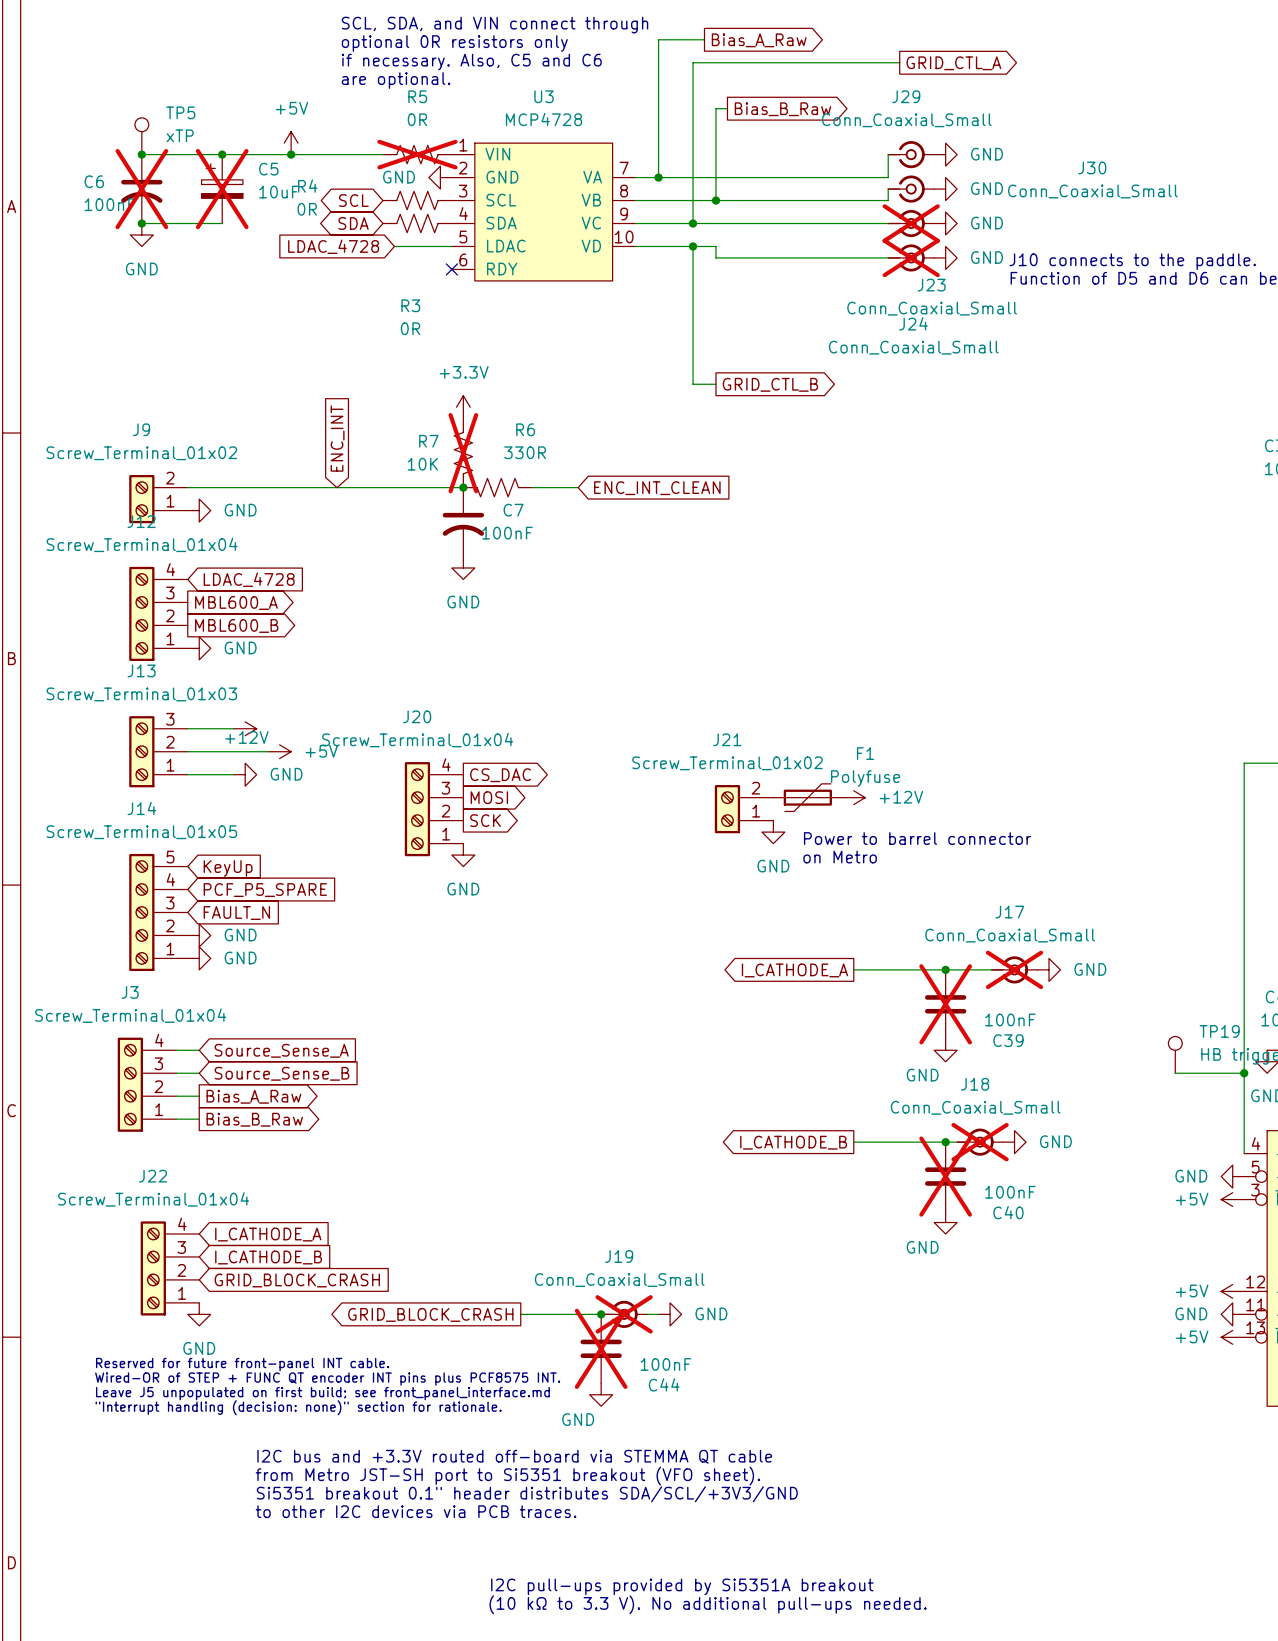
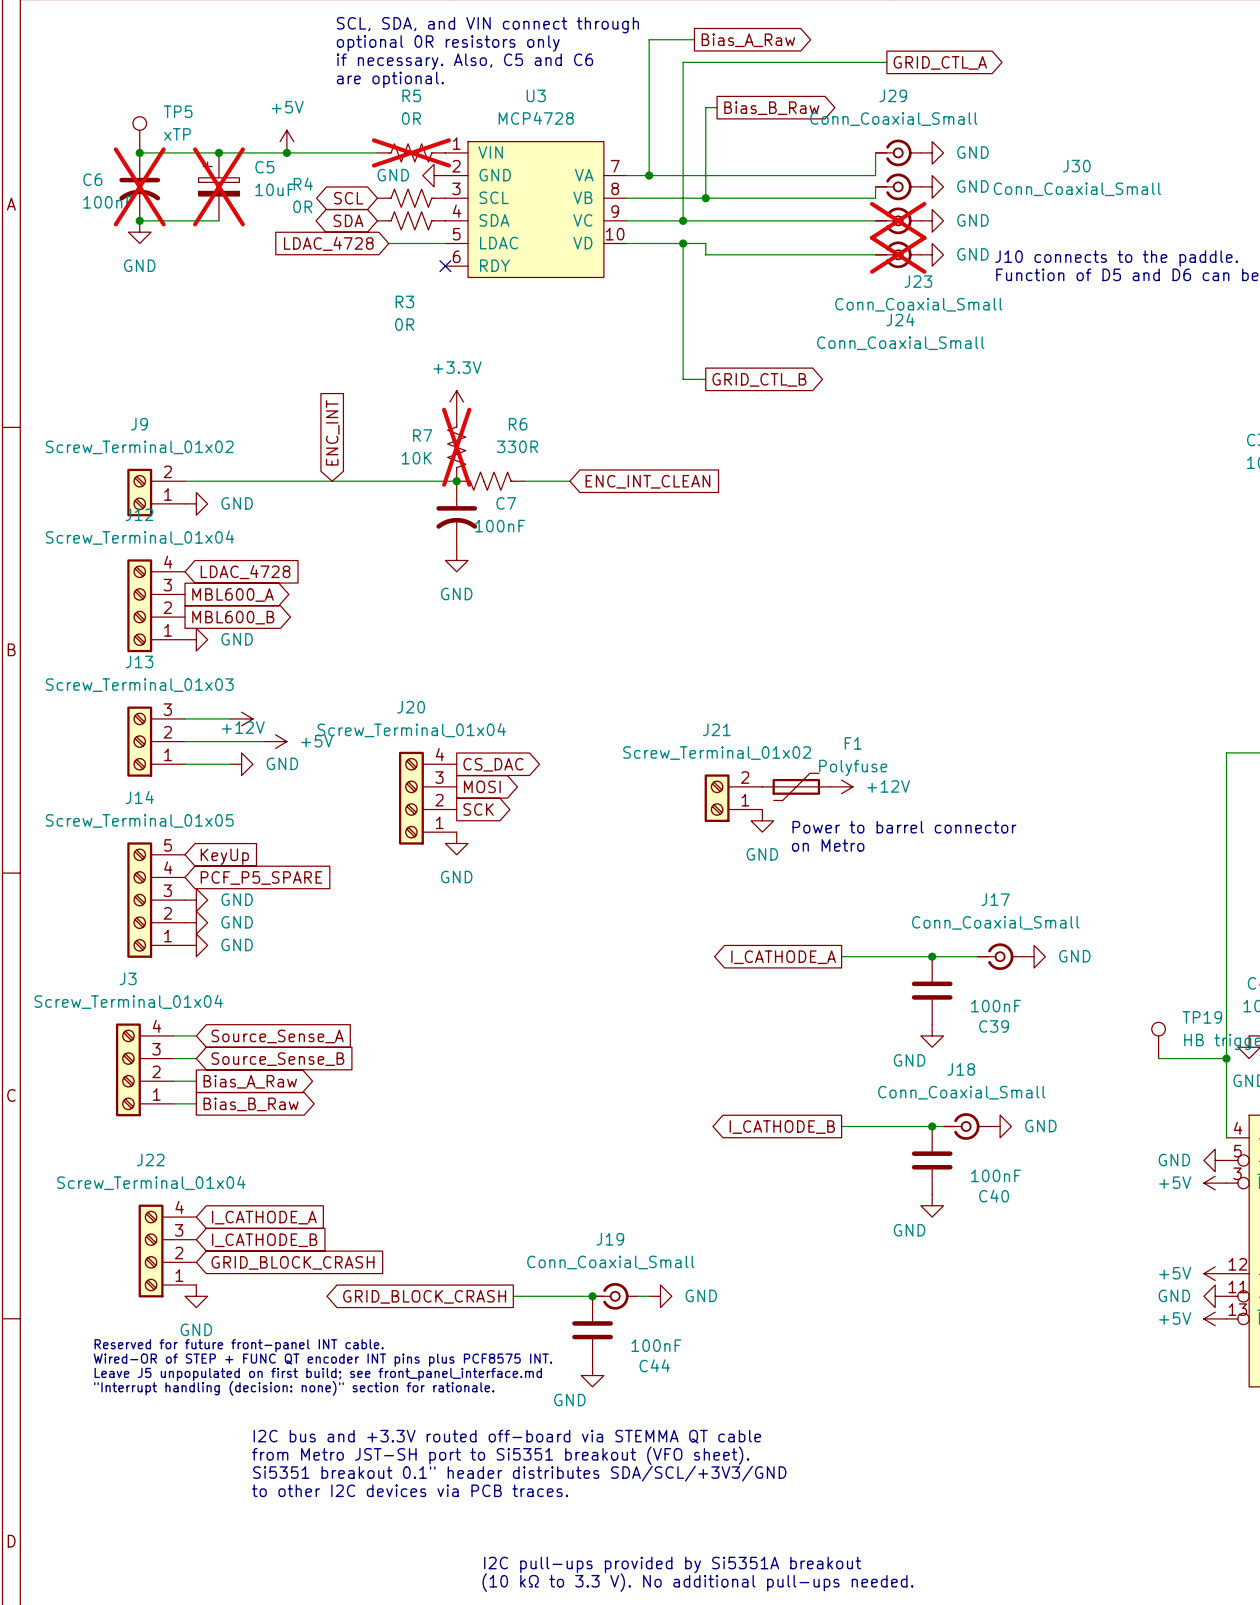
power symbol: none -> GND (196, 900)
global label: FAULT_N (236, 913) -> none
J17 do-not-place cross: (1014, 969) -> none
C39 do-not-place cross: (945, 1004) -> none
J18 do-not-place cross: (980, 1142) -> none
C40 do-not-place cross: (945, 1176) -> none
J19 do-not-place cross: (624, 1314) -> none
C44 do-not-place cross: (601, 1348) -> none

